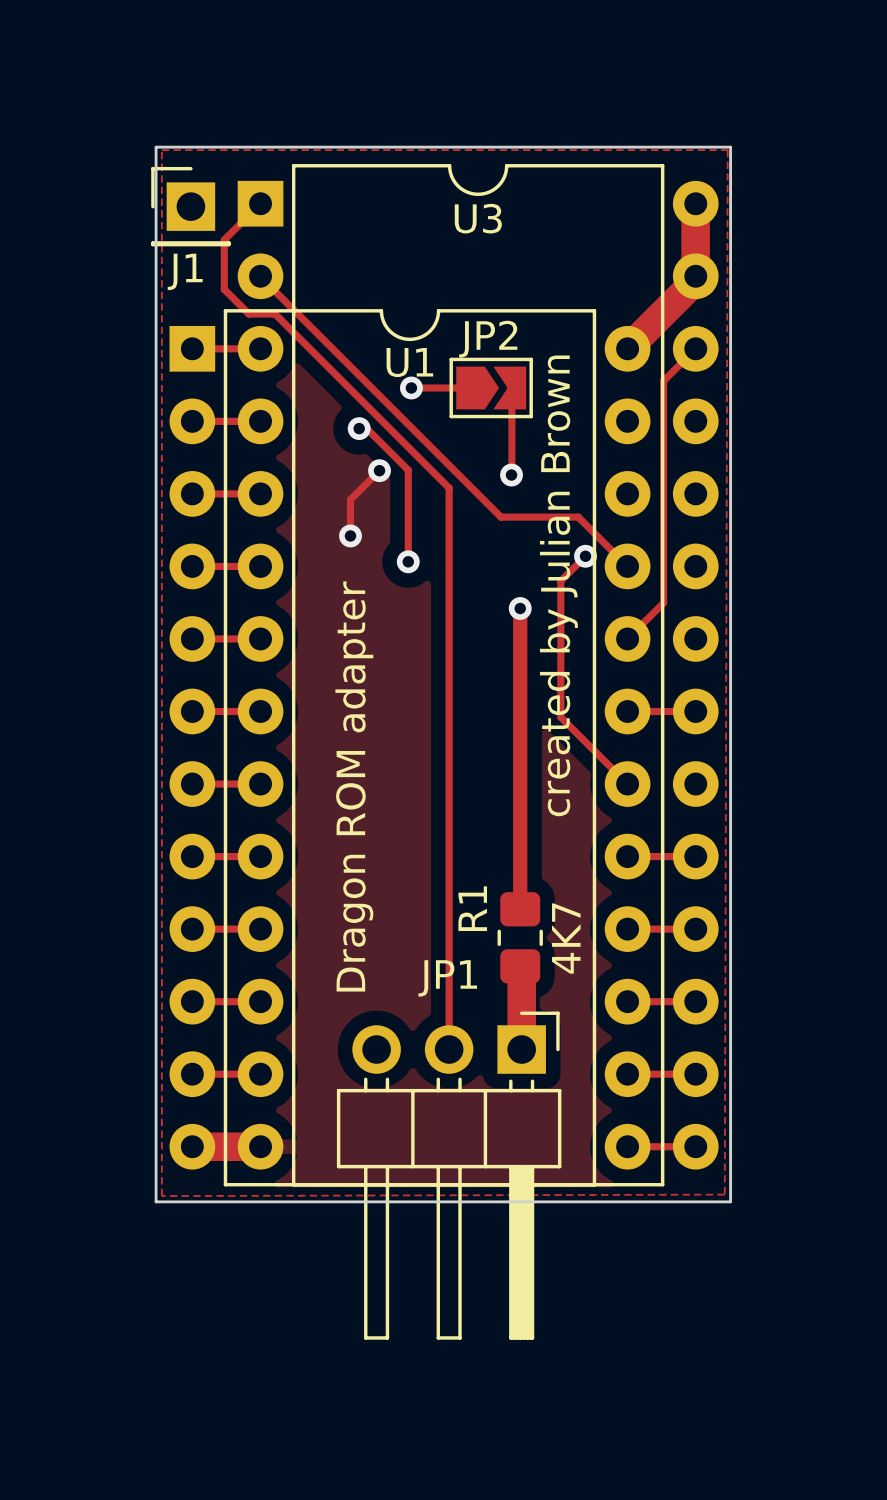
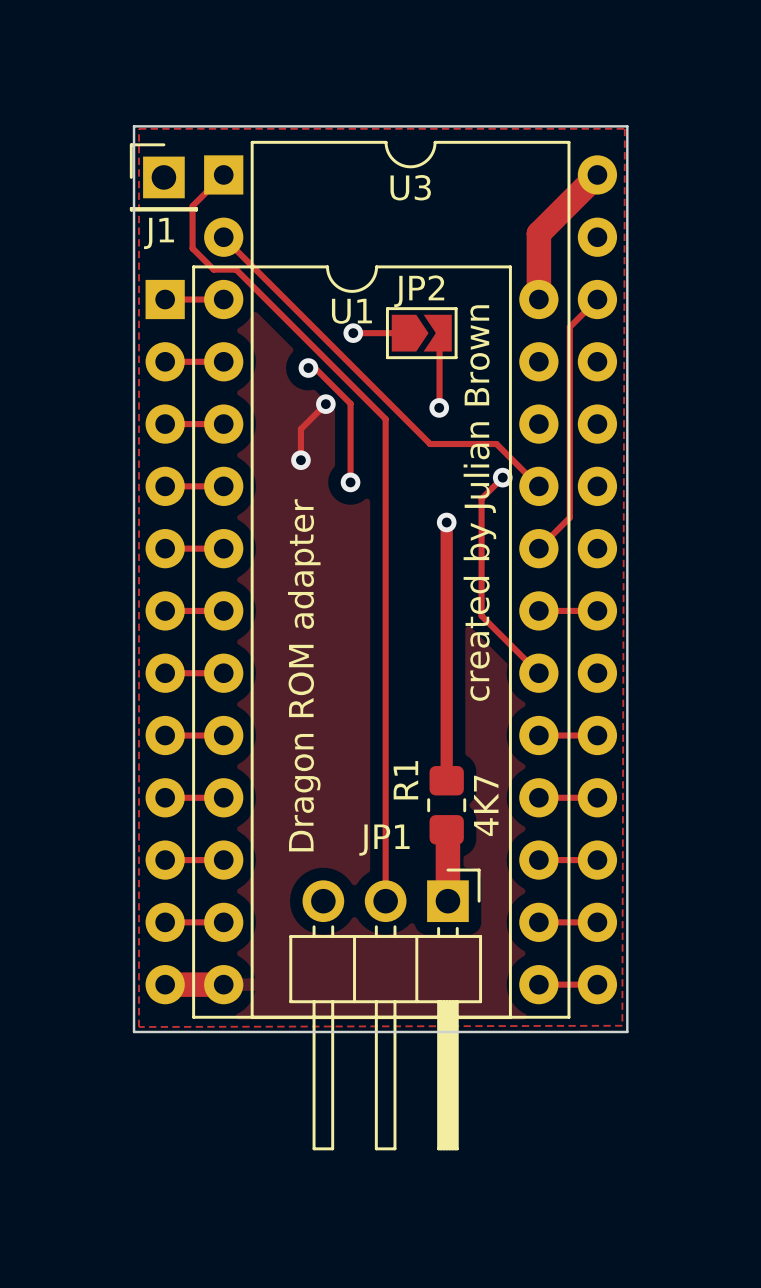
track: (695, 204) (695, 280) (627, 348) -> (597, 175) (538, 233) (538, 299)

